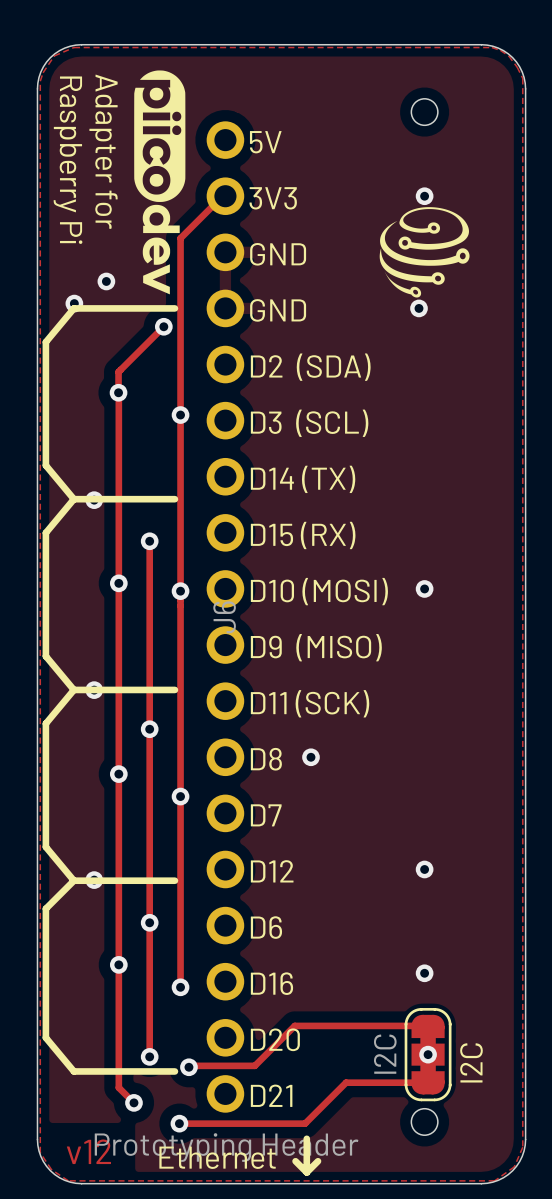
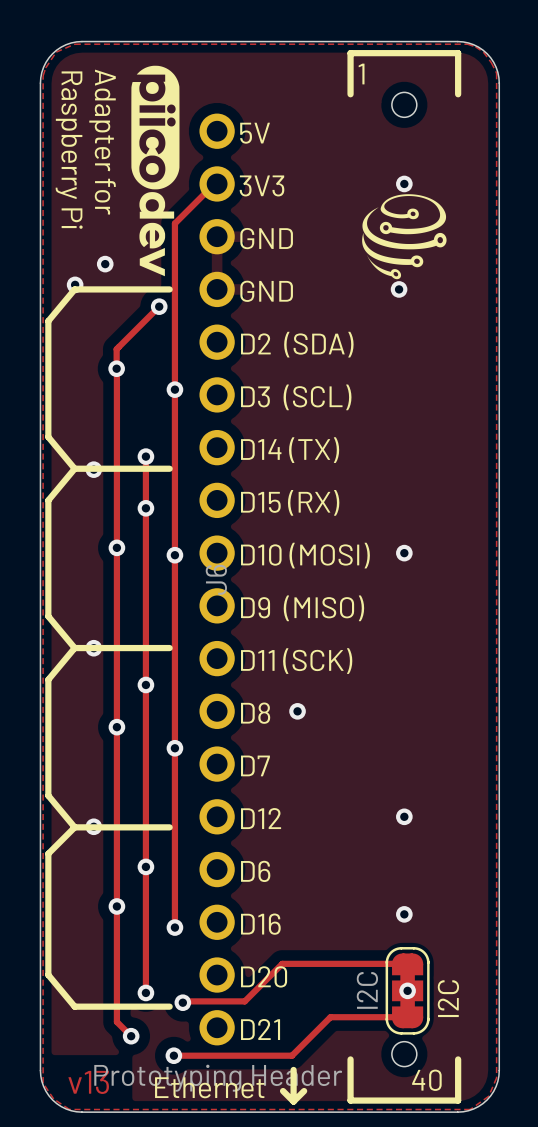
text: none -> 1 (361, 74)
line: none -> (350, 94) (350, 53) (458, 53) (458, 94)
track: none -> (145, 456) (145, 508)
via: none -> (145, 456)
line: none -> (350, 1059) (350, 1100) (458, 1100) (458, 1059)
text: none -> 40 (426, 1080)
text: v12 (88, 1151) -> v13 (88, 1082)

